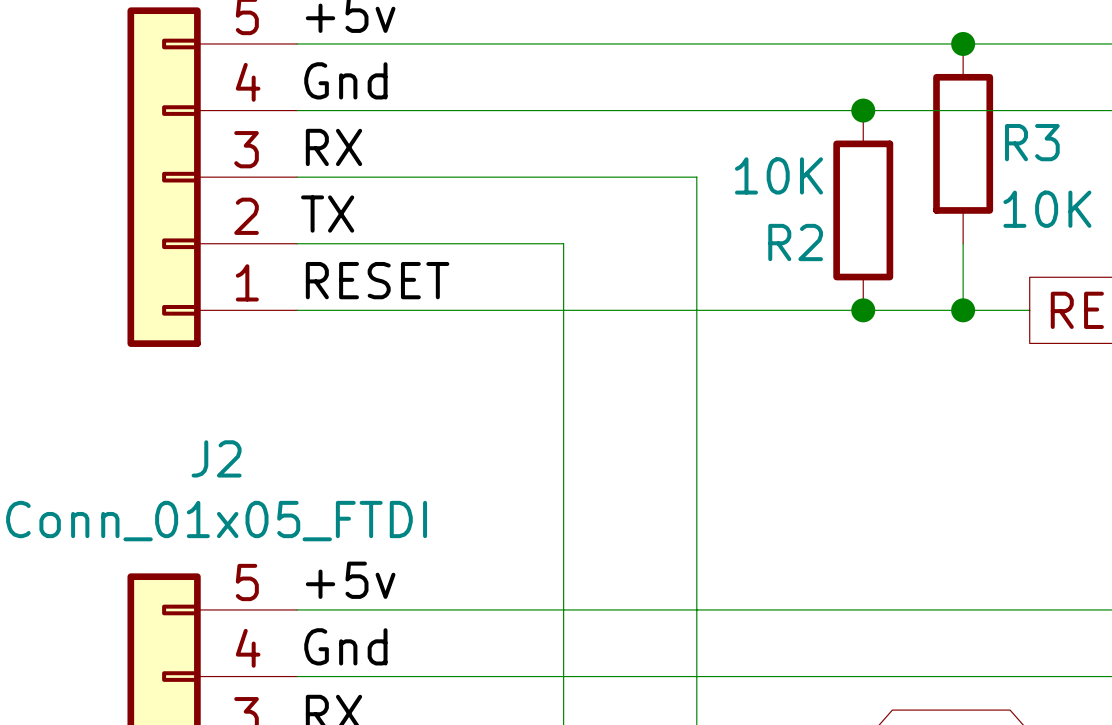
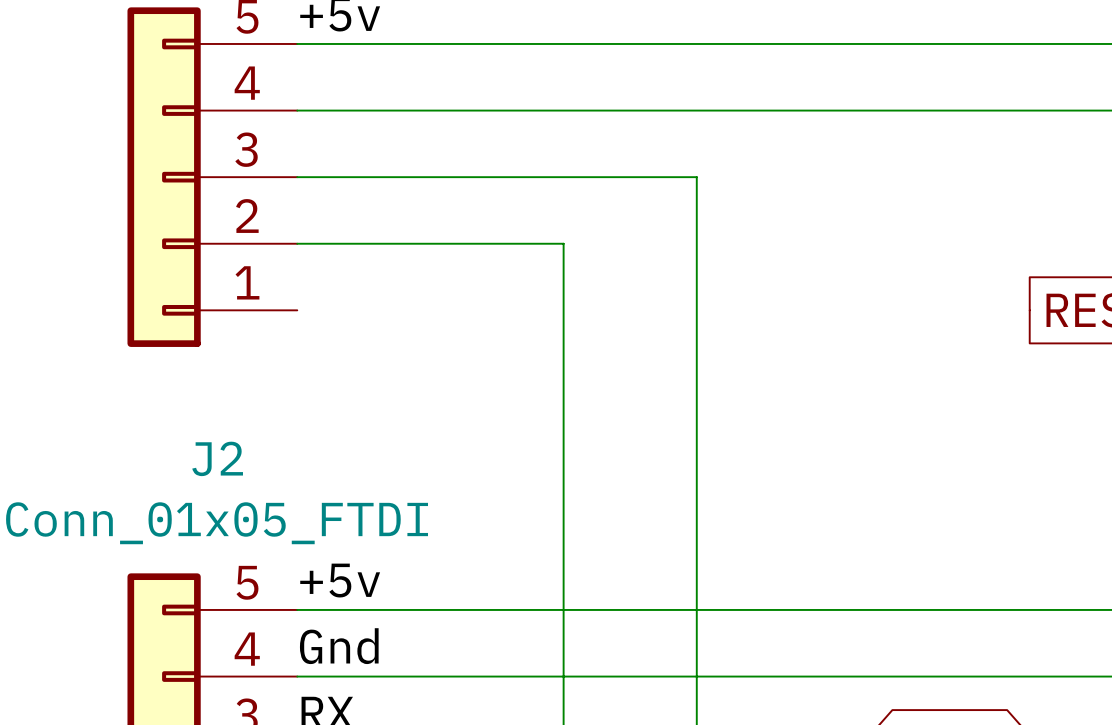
junction: (963, 43) -> none
label: Gnd (345, 80) -> none
junction: (863, 110) -> none
R3: 10K (963, 143) -> none
label: RX (333, 147) -> none
R2: 10K (863, 210) -> none
label: TX (327, 214) -> none
wire: (963, 243) (963, 310) -> none
label: RESET (377, 280) -> none
wire: (297, 310) (1029, 310) -> none
junction: (863, 310) -> none
junction: (963, 310) -> none

